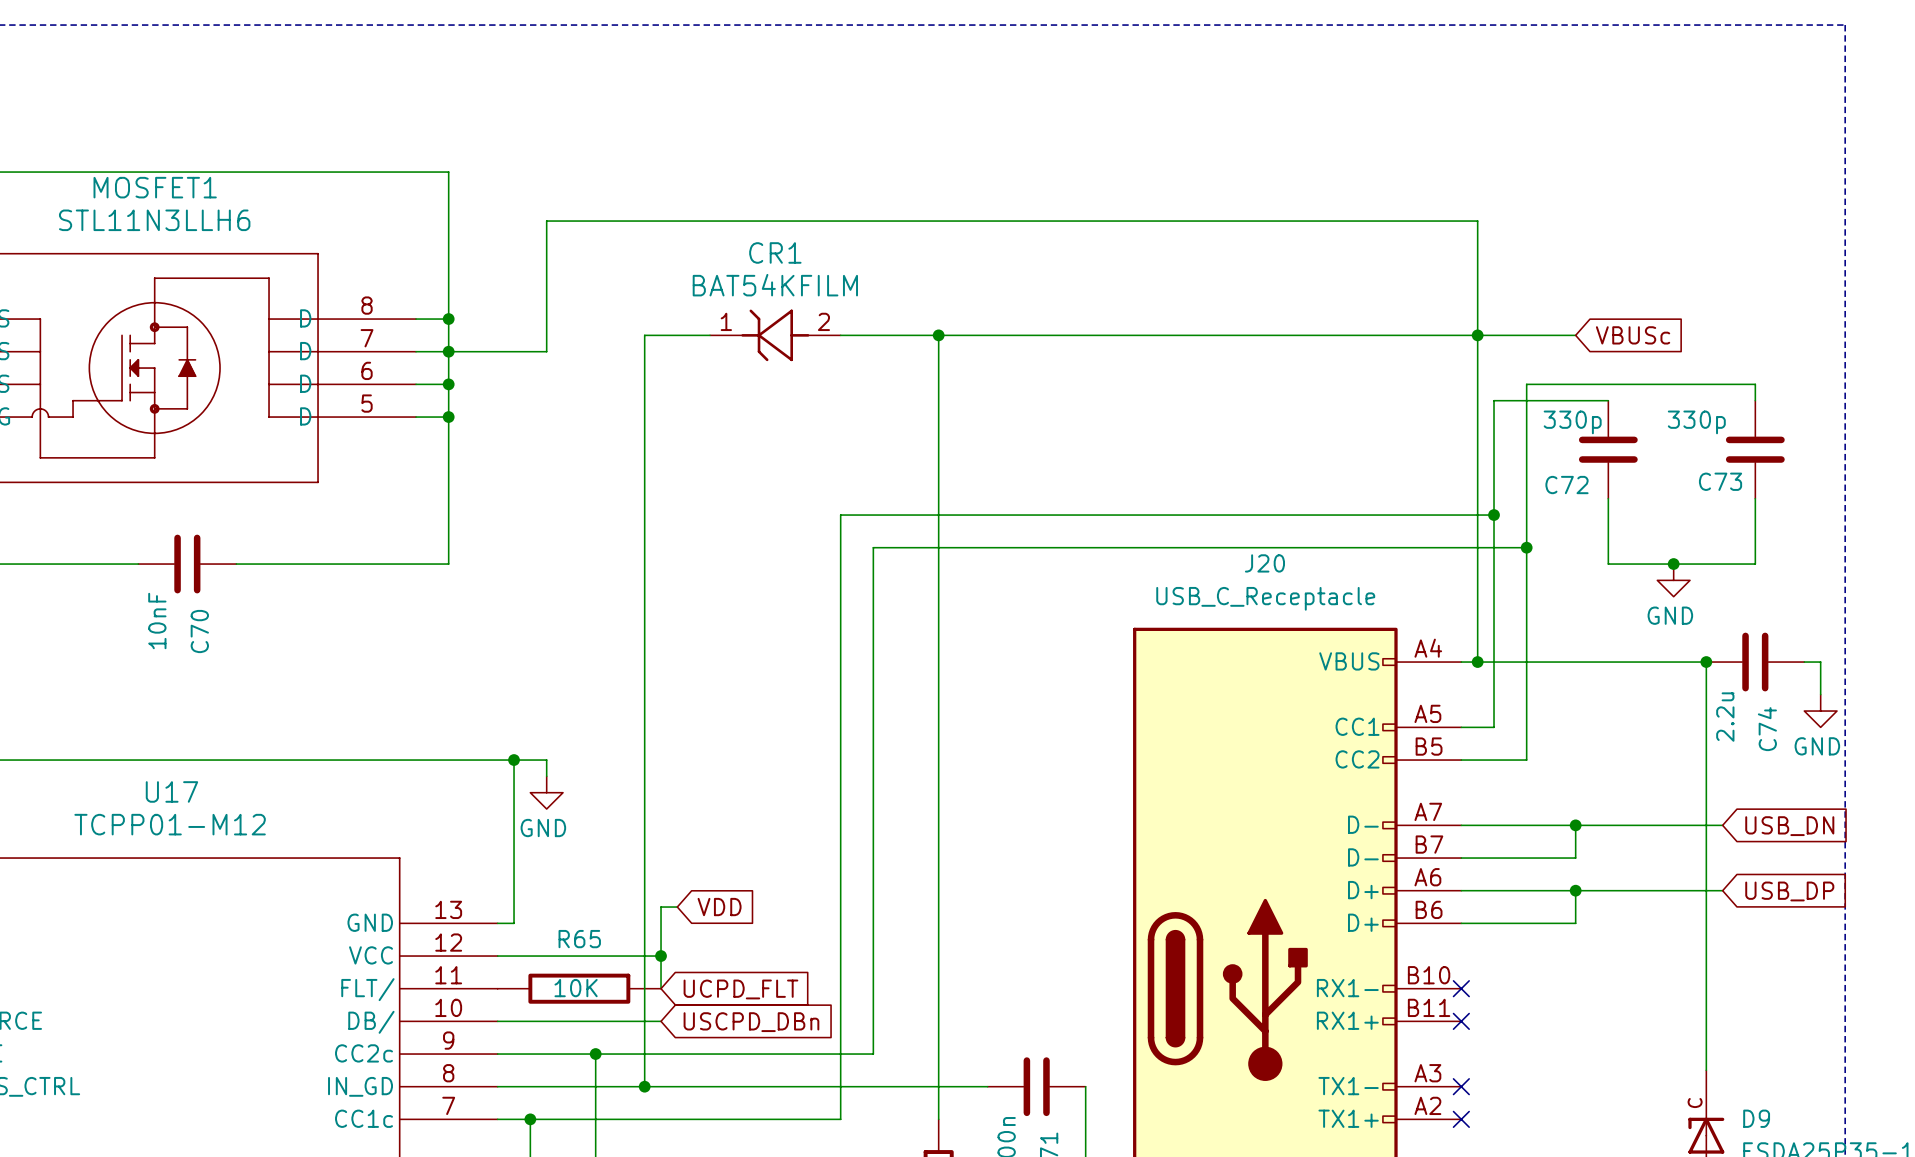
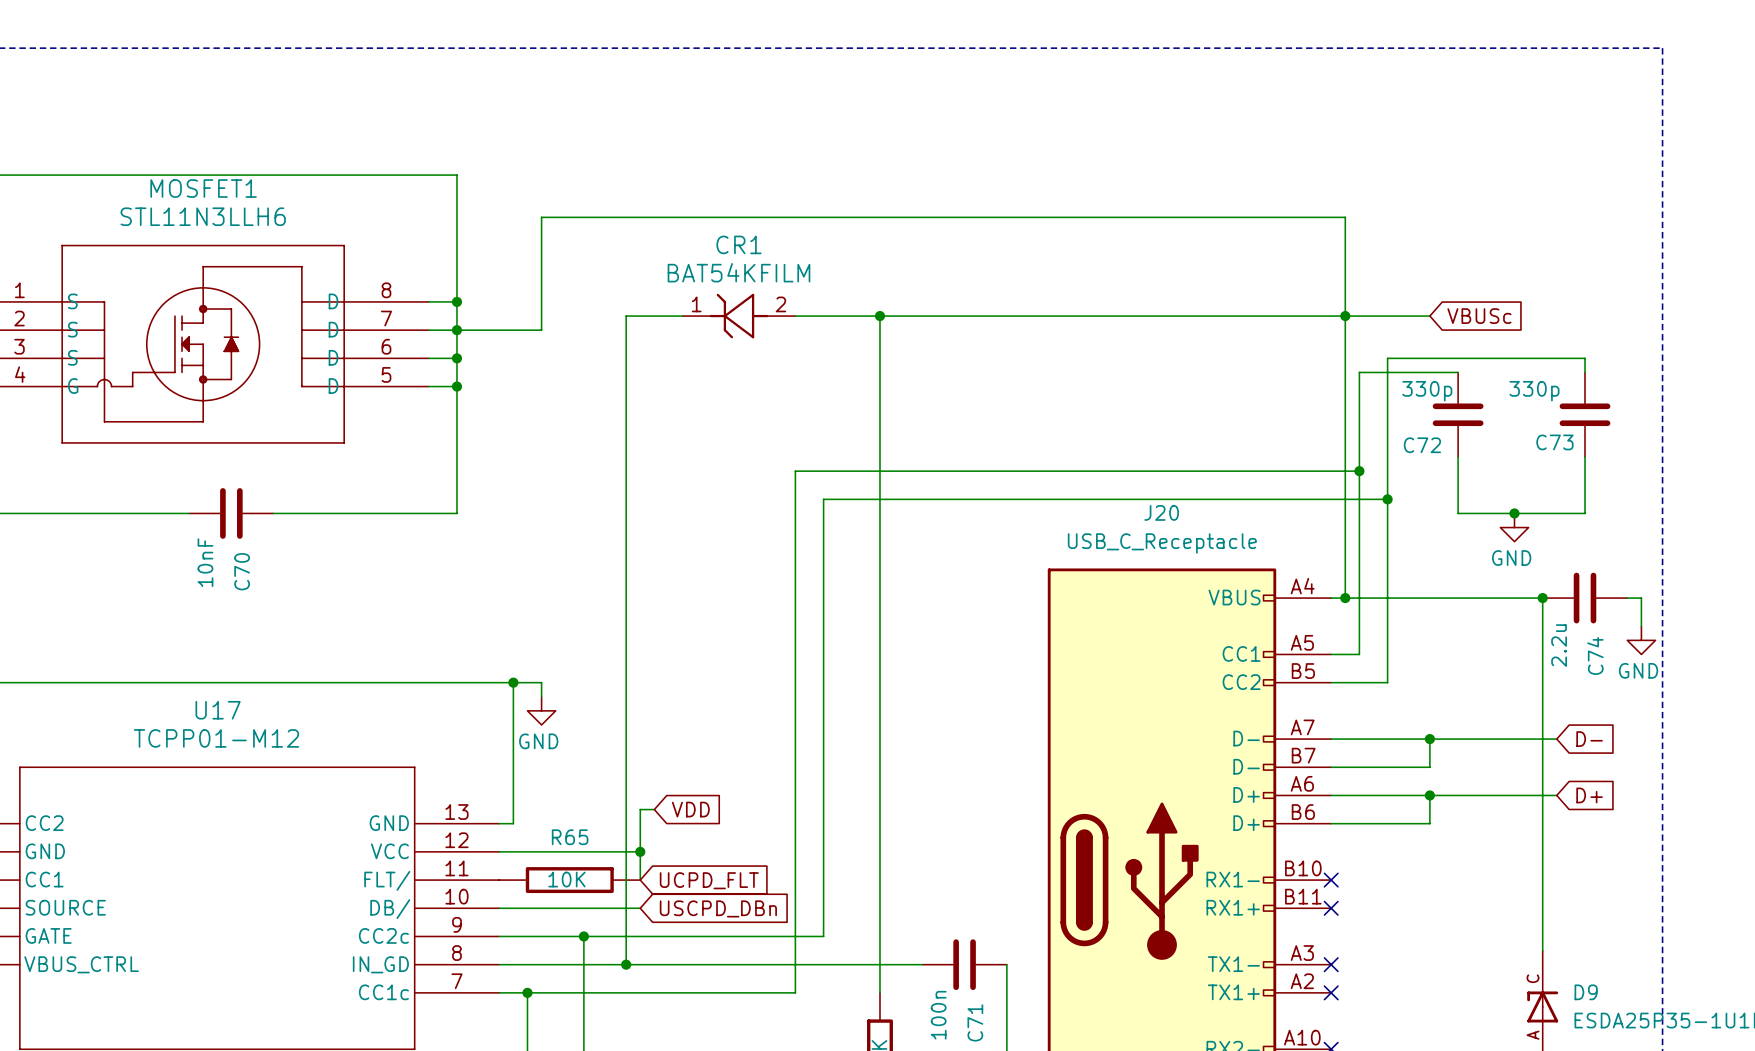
global label: USB_DN (1789, 826) -> D- (1589, 739)
global label: USB_DP (1789, 891) -> D+ (1589, 795)

